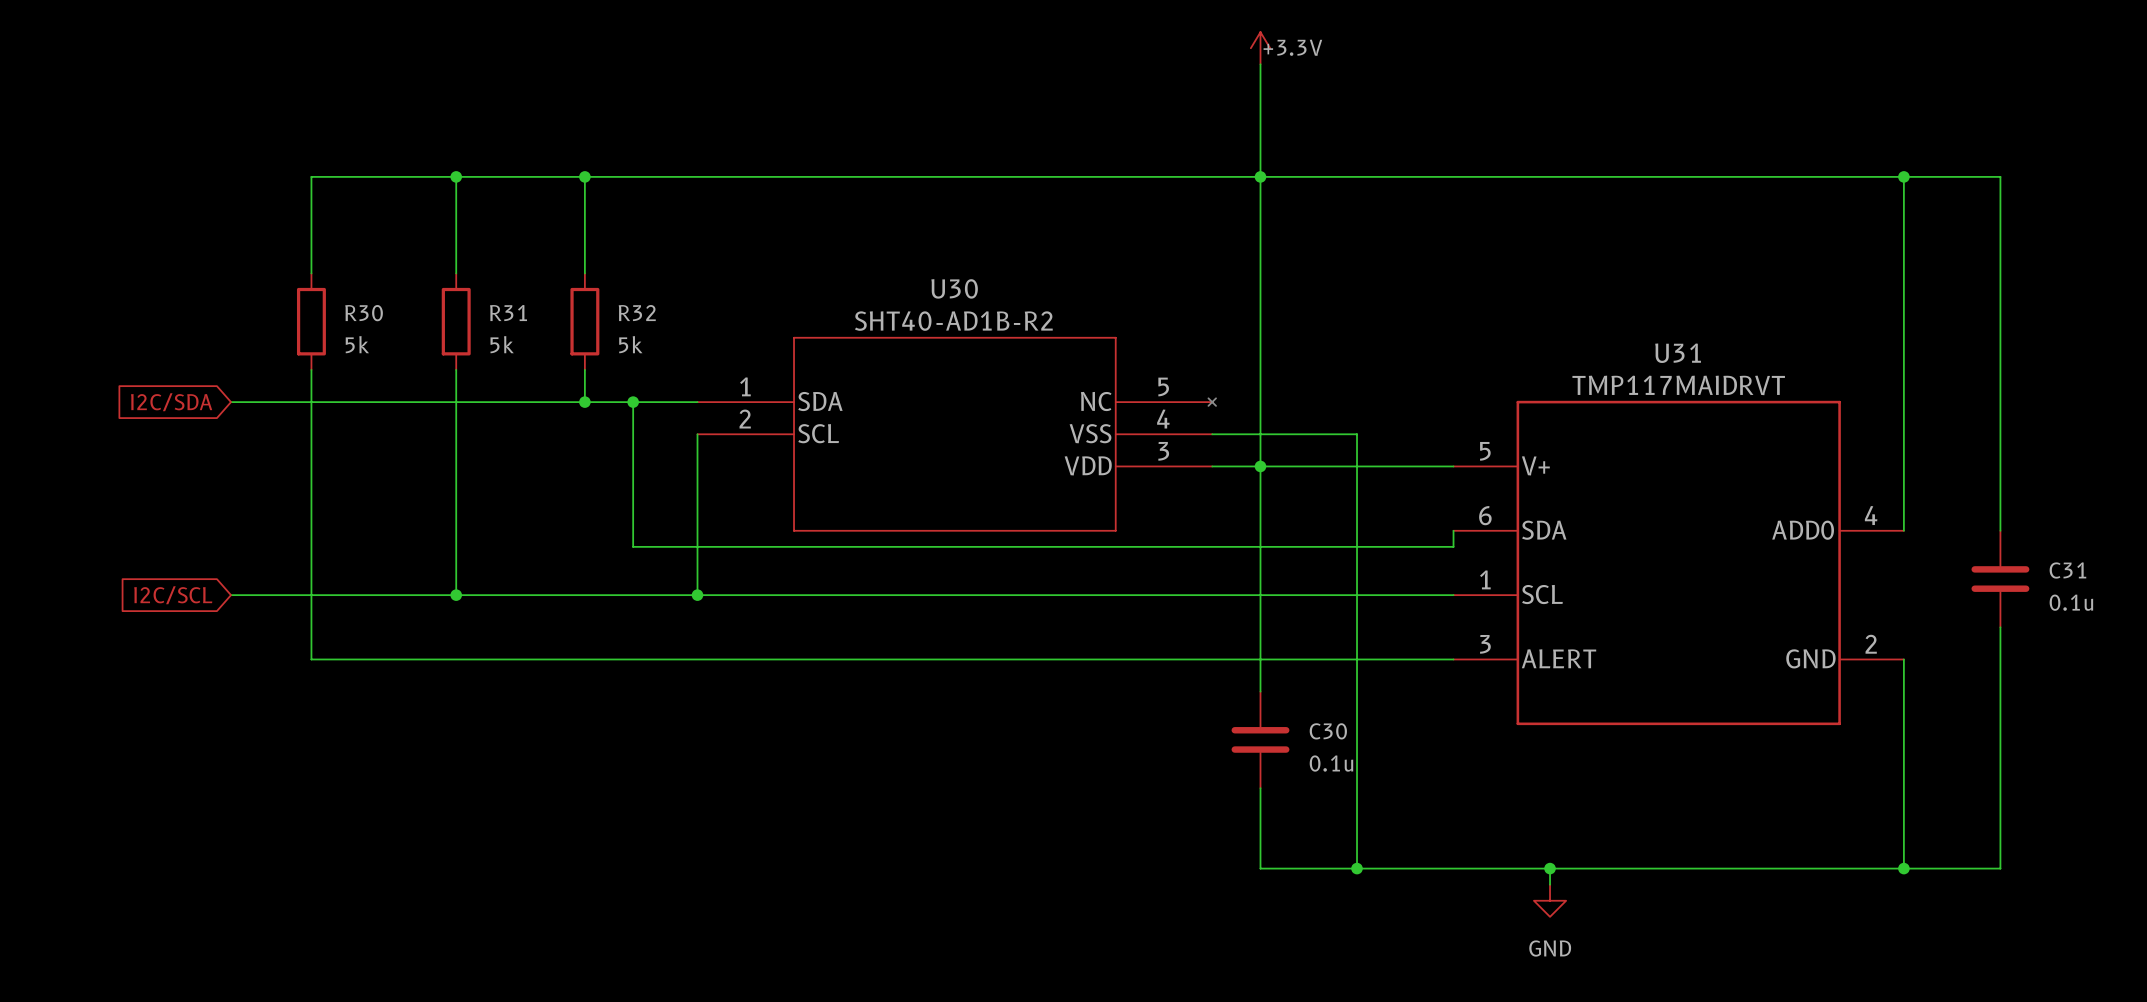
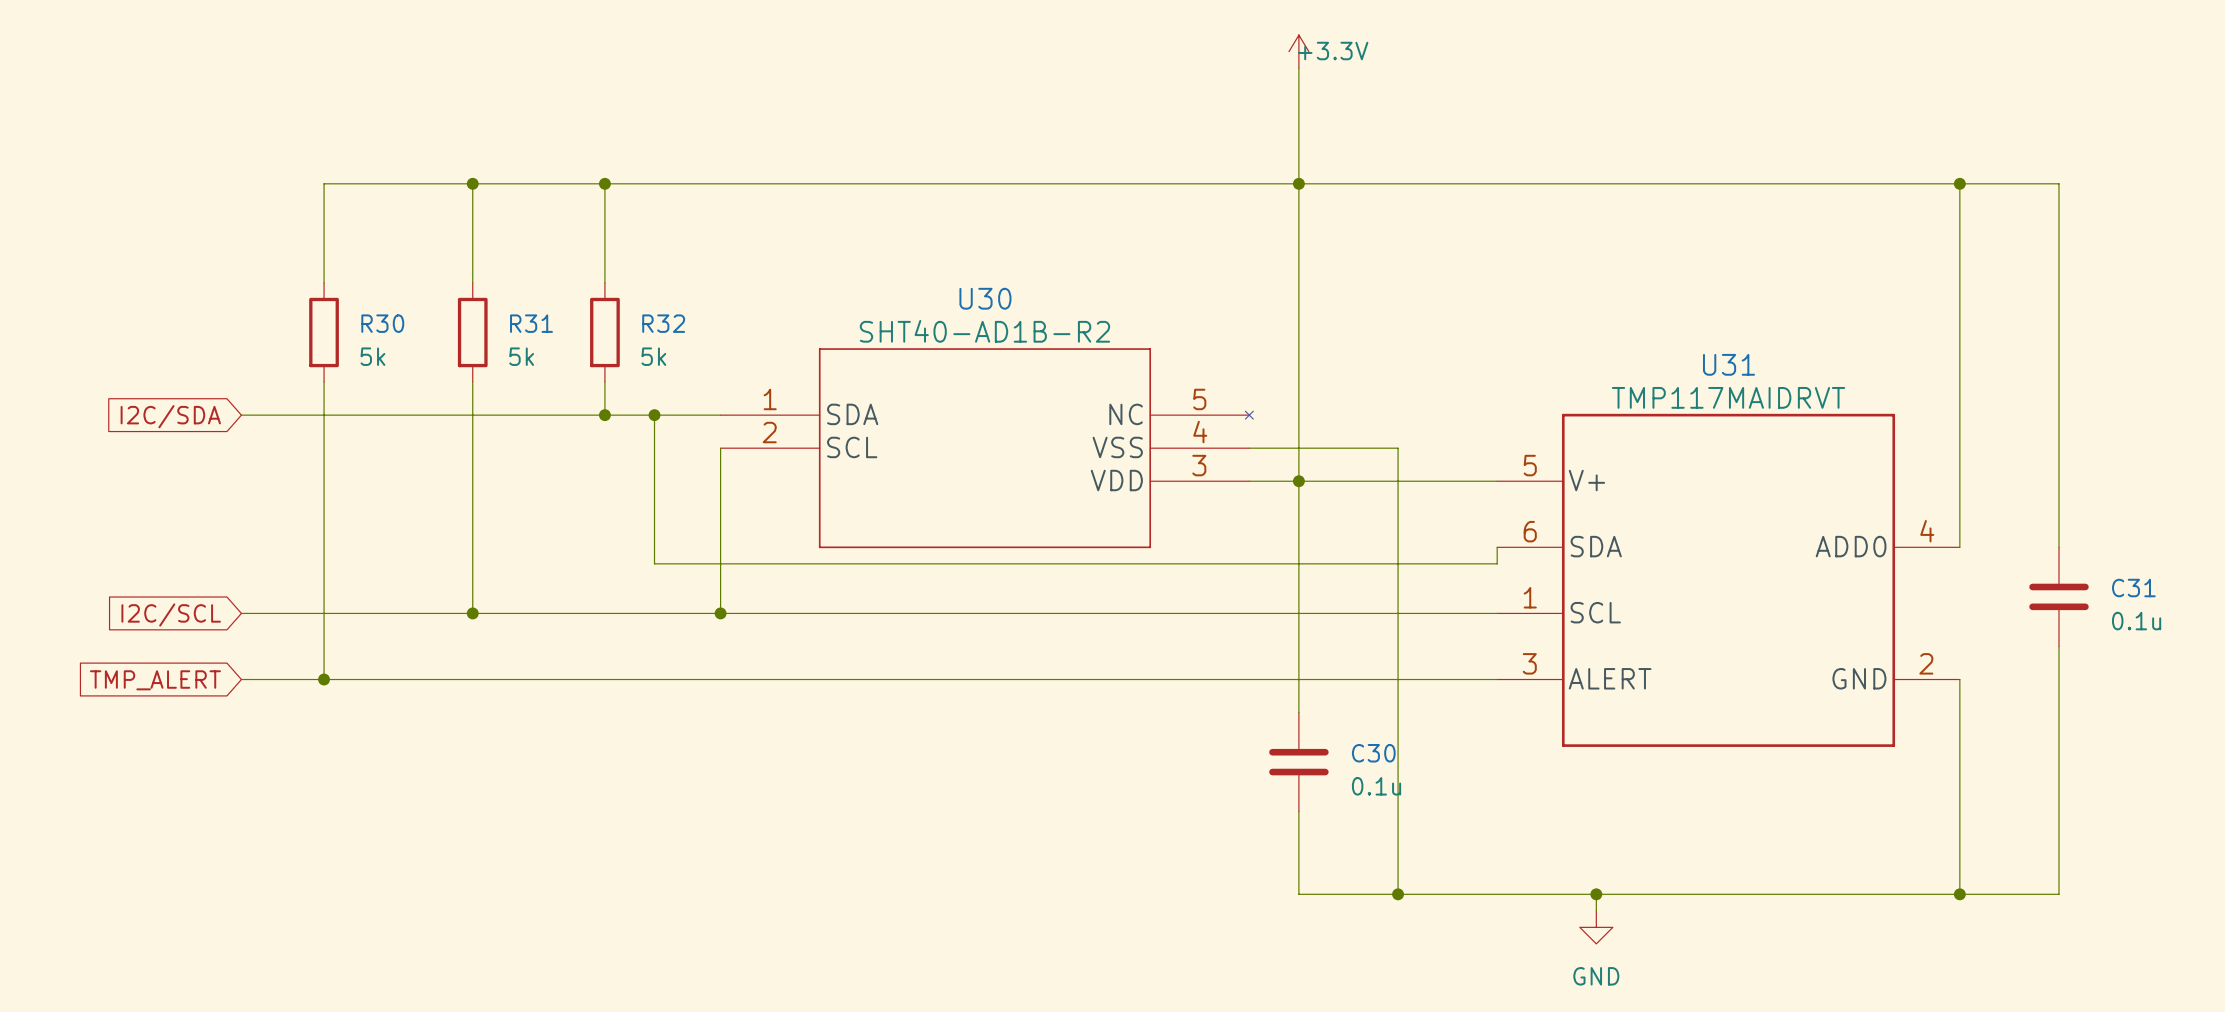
wire: none -> (241, 679) (324, 679)
junction: none -> (324, 679)
global label: none -> TMP_ALERT (155, 680)

